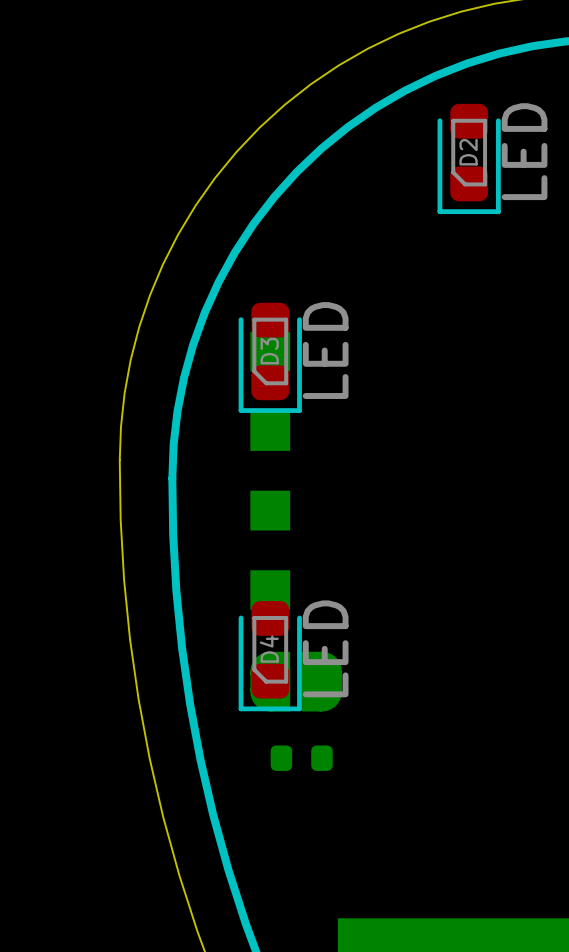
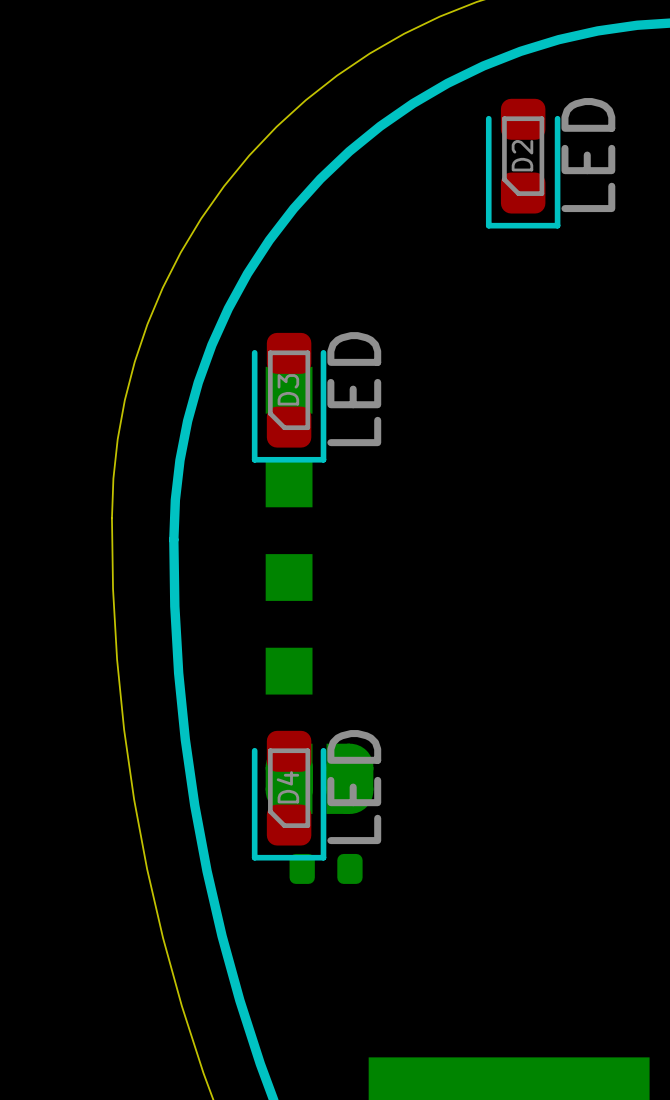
D4 position: (270, 656) -> (289, 795)

